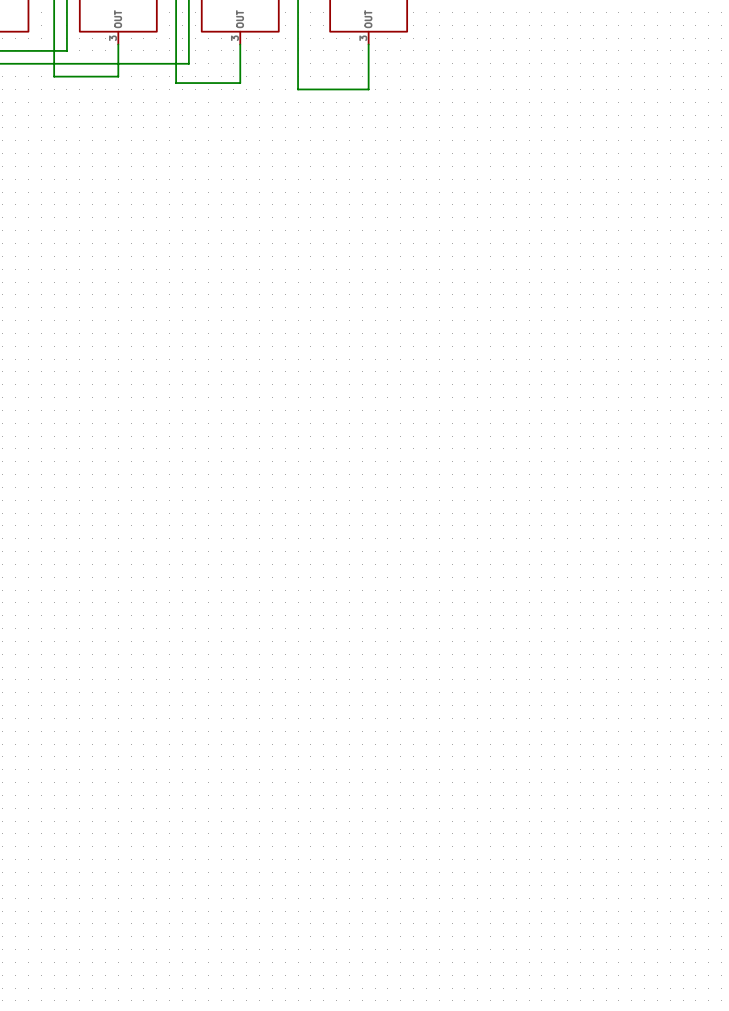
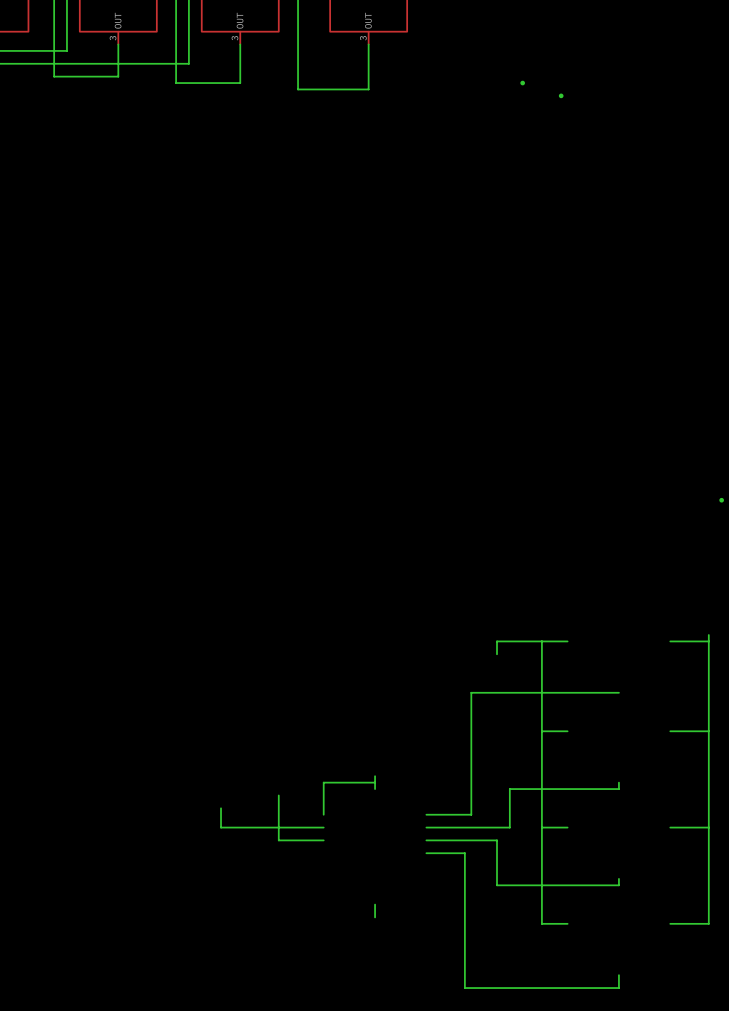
junction: none -> (522, 83)
junction: none -> (561, 95)
junction: none -> (721, 500)
wire: none -> (708, 635) (708, 923) (670, 923)
wire: none -> (541, 641) (541, 923) (567, 923)
wire: none -> (567, 641) (497, 641) (497, 654)
wire: none -> (670, 641) (708, 641)
wire: none -> (618, 692) (471, 692) (471, 814) (426, 814)
wire: none -> (541, 731) (567, 731)
wire: none -> (670, 731) (708, 731)
wire: none -> (375, 776) (375, 789)
wire: none -> (375, 782) (323, 782) (323, 814)
wire: none -> (618, 782) (618, 789) (509, 789) (509, 827) (426, 827)
wire: none -> (278, 795) (278, 840) (323, 840)
wire: none -> (221, 808) (221, 827) (323, 827)
wire: none -> (541, 827) (567, 827)
wire: none -> (670, 827) (708, 827)
wire: none -> (426, 840) (497, 840) (497, 885) (618, 885) (618, 878)
wire: none -> (426, 853) (464, 853) (464, 988) (618, 988) (618, 975)
wire: none -> (375, 904) (375, 917)

